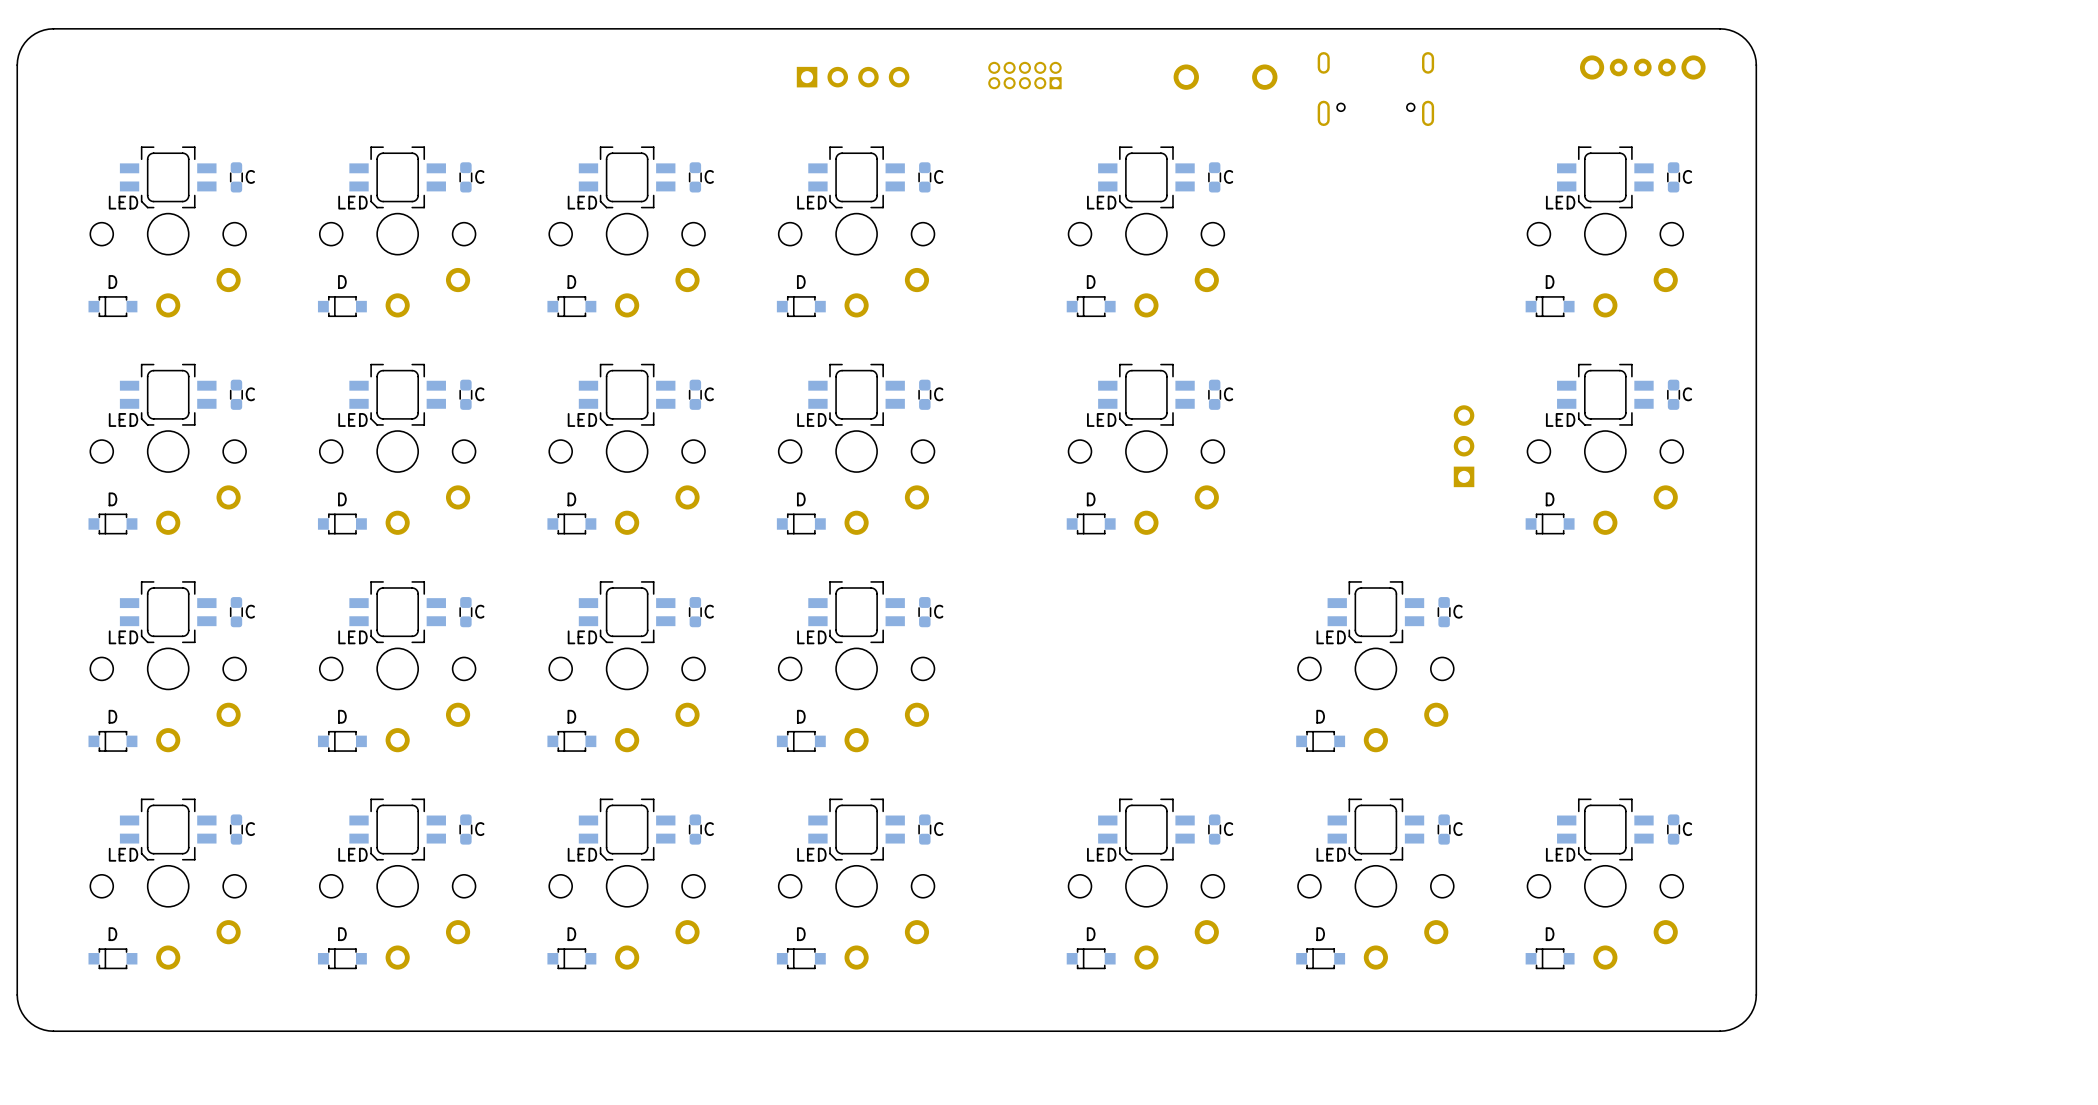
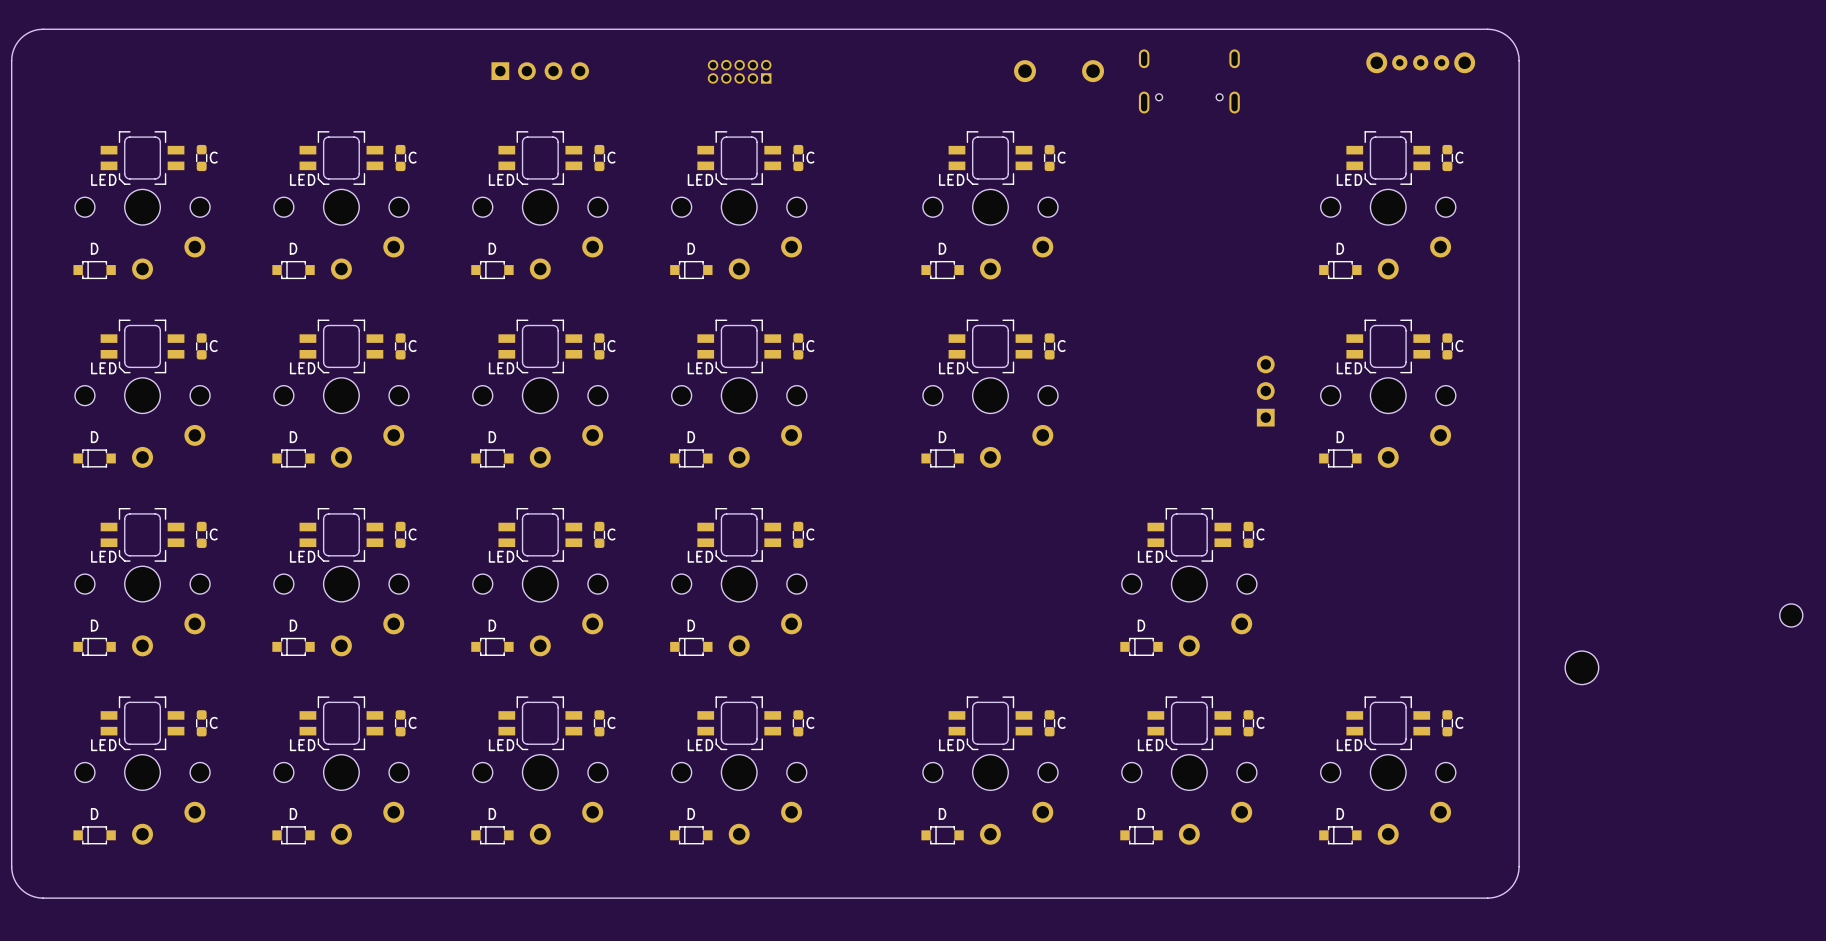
part footprint: [796, 66, 910, 88] -> [707, 59, 772, 84]
part: (1024, 75) -> none
part: none -> (540, 71)
part: none -> (1791, 615)
part: none -> (1581, 667)

